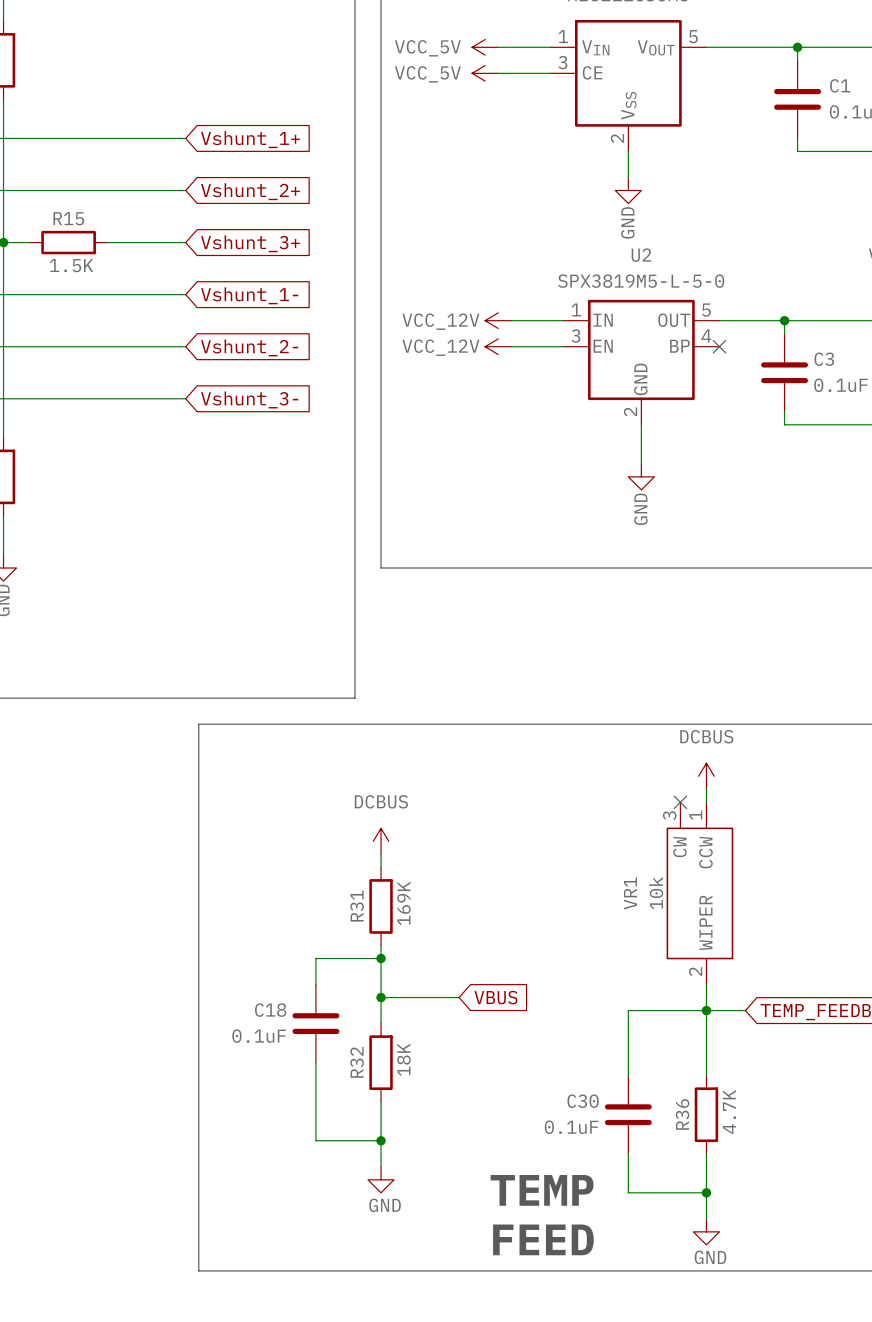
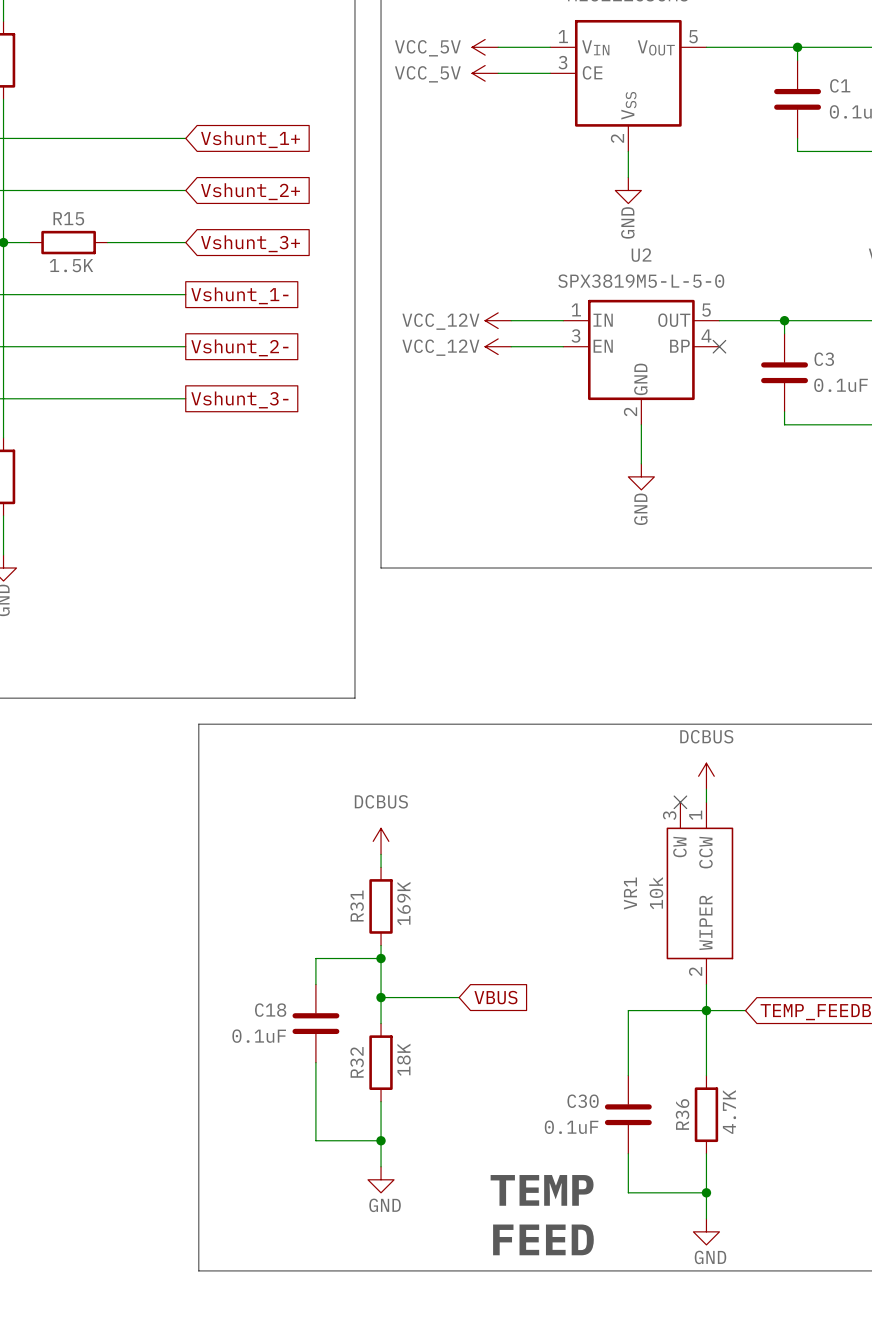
global label shape: input (249, 295) -> passive (239, 295)
global label shape: input (249, 347) -> passive (239, 347)
global label shape: input (249, 399) -> passive (239, 399)

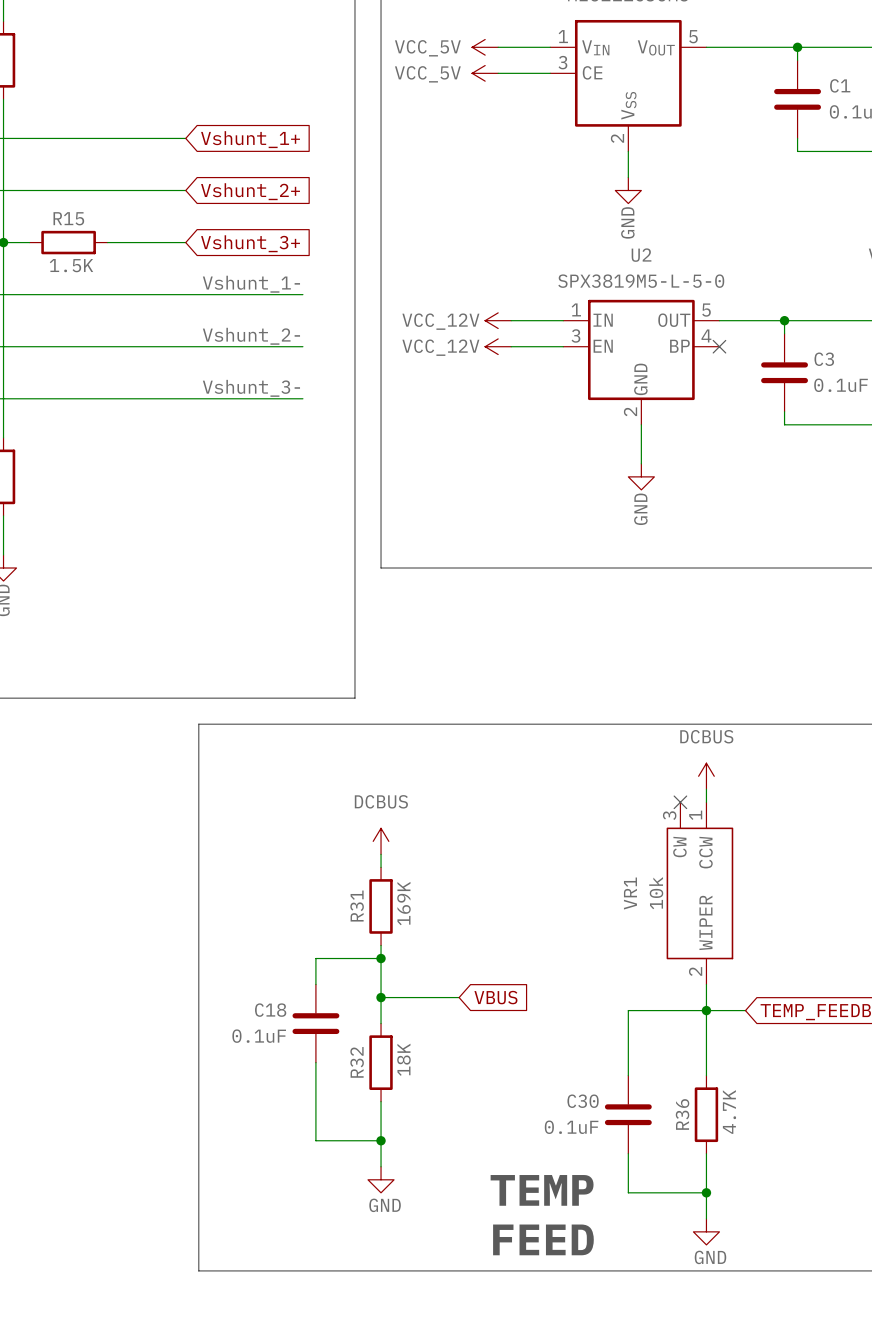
label: none -> Vshunt_1- (251, 284)
wire: none -> (185, 294) (302, 294)
global label: Vshunt_1- (239, 295) -> none
label: none -> Vshunt_2- (251, 336)
wire: none -> (185, 346) (302, 346)
global label: Vshunt_2- (239, 347) -> none
label: none -> Vshunt_3- (251, 388)
wire: none -> (185, 398) (302, 398)
global label: Vshunt_3- (239, 399) -> none

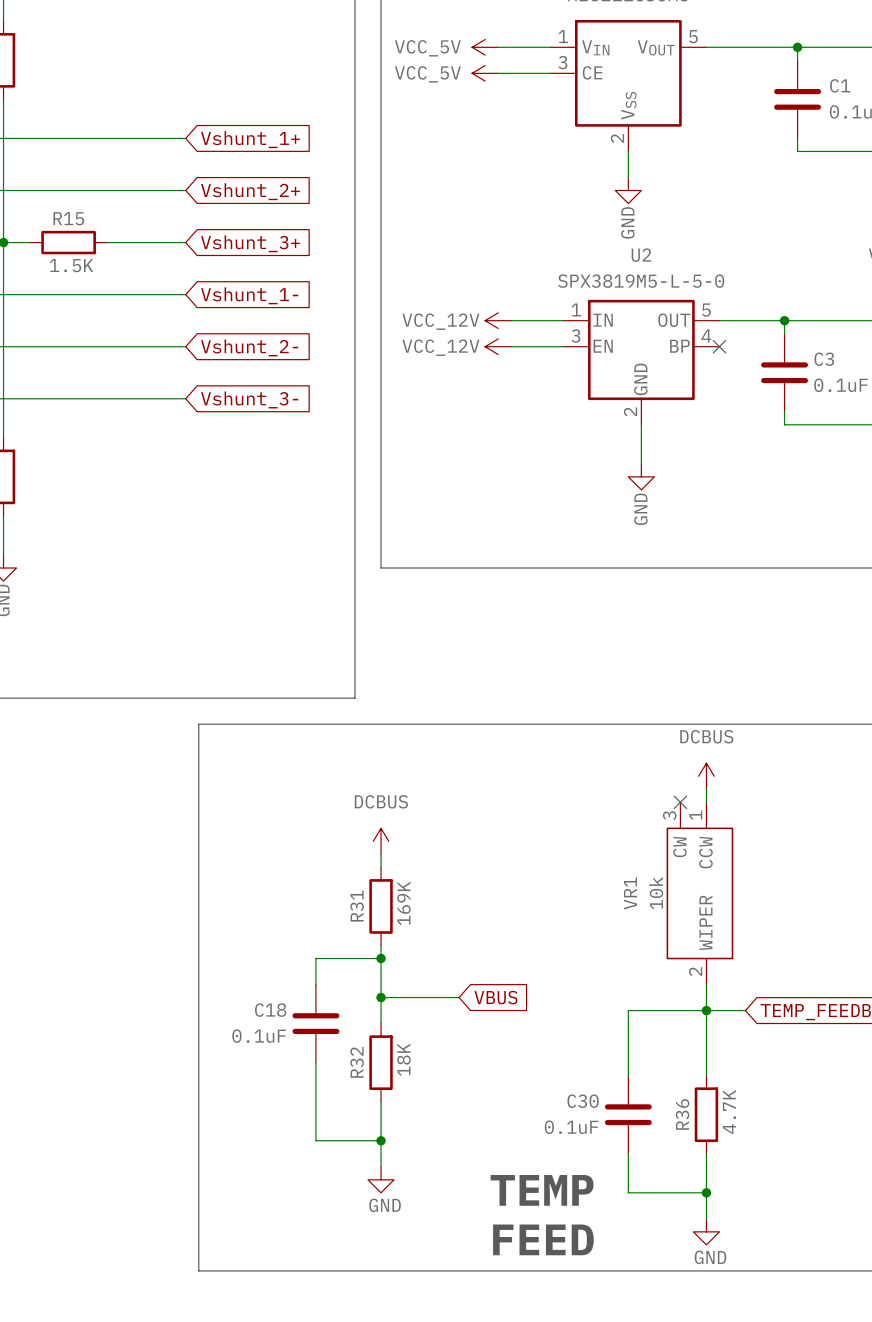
label: Vshunt_1- (251, 284) -> none
wire: (185, 294) (302, 294) -> none
global label: none -> Vshunt_1- (249, 295)
label: Vshunt_2- (251, 336) -> none
wire: (185, 346) (302, 346) -> none
global label: none -> Vshunt_2- (249, 347)
label: Vshunt_3- (251, 388) -> none
wire: (185, 398) (302, 398) -> none
global label: none -> Vshunt_3- (249, 399)

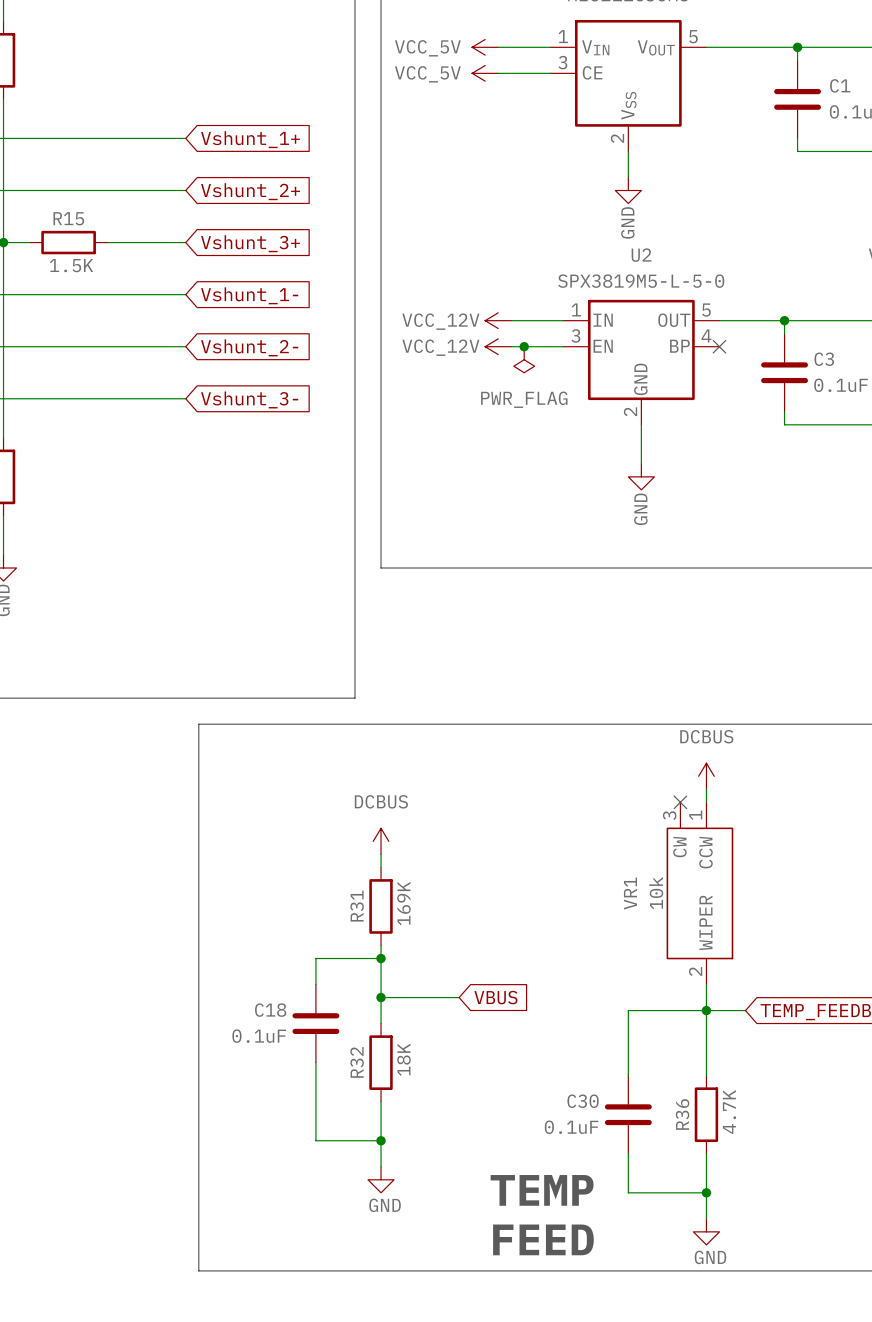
junction: none -> (524, 346)
power symbol: none -> PWR_FLAG (524, 359)

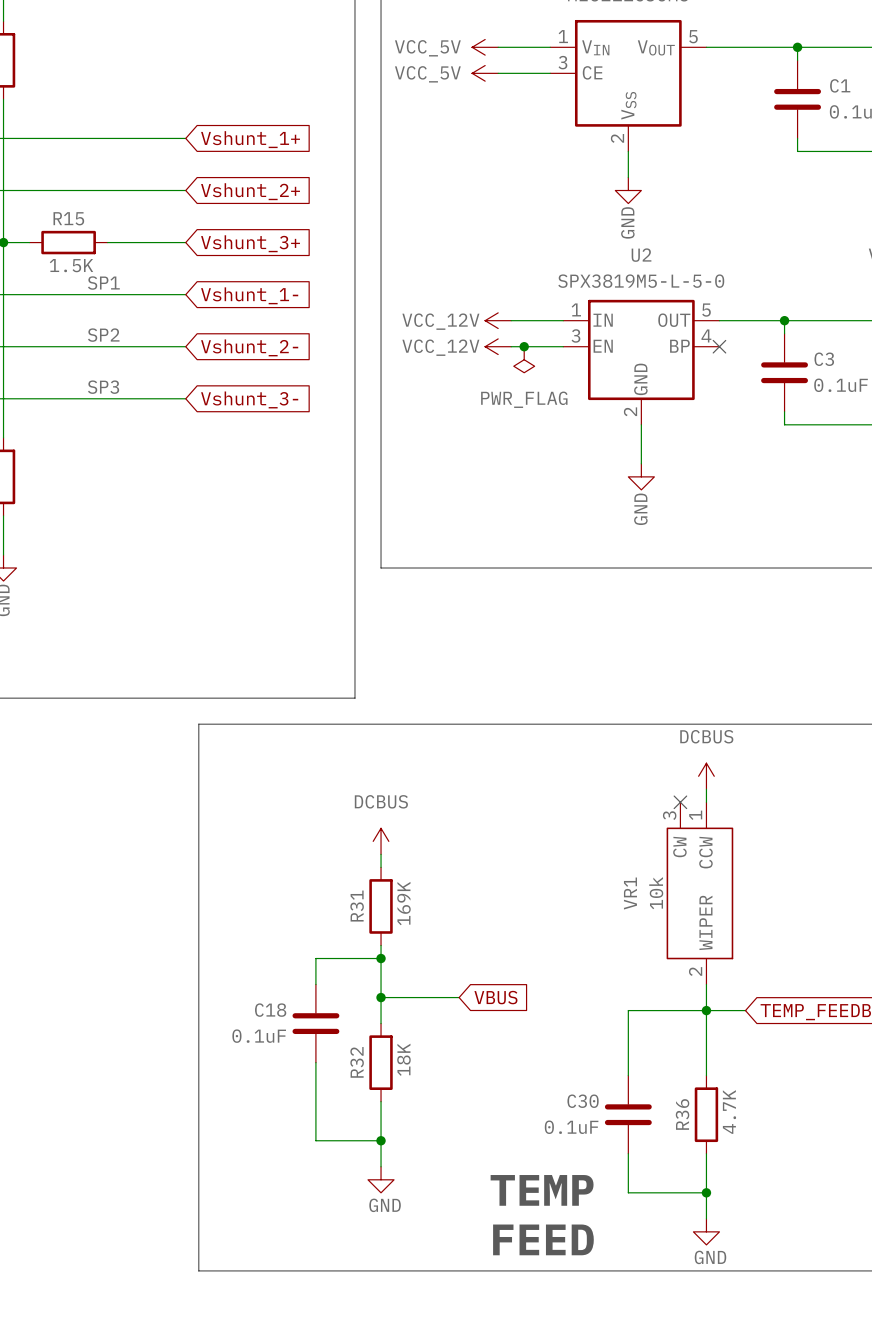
label: none -> SP1 (103, 283)
label: none -> SP2 (103, 335)
label: none -> SP3 (103, 387)

